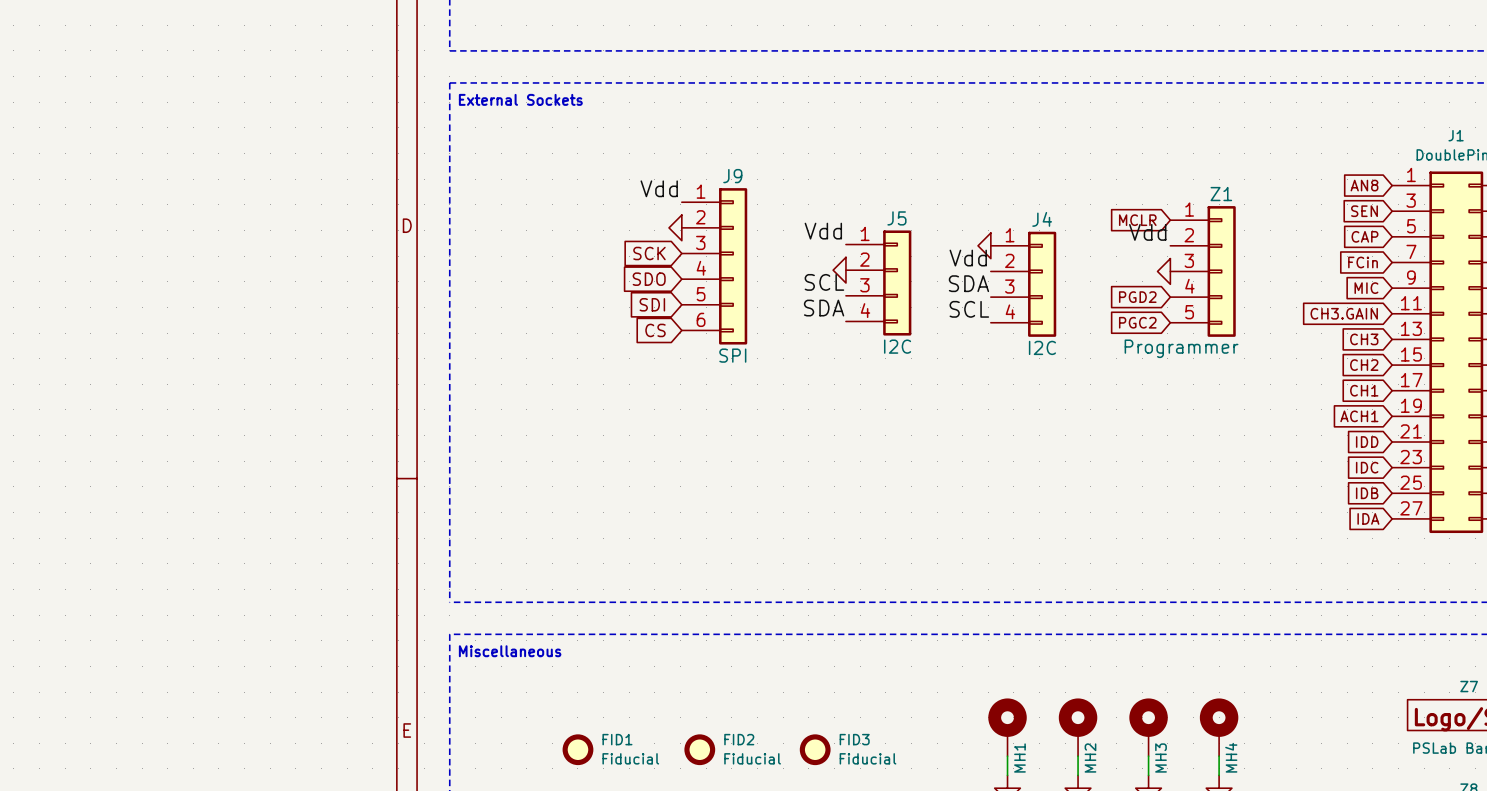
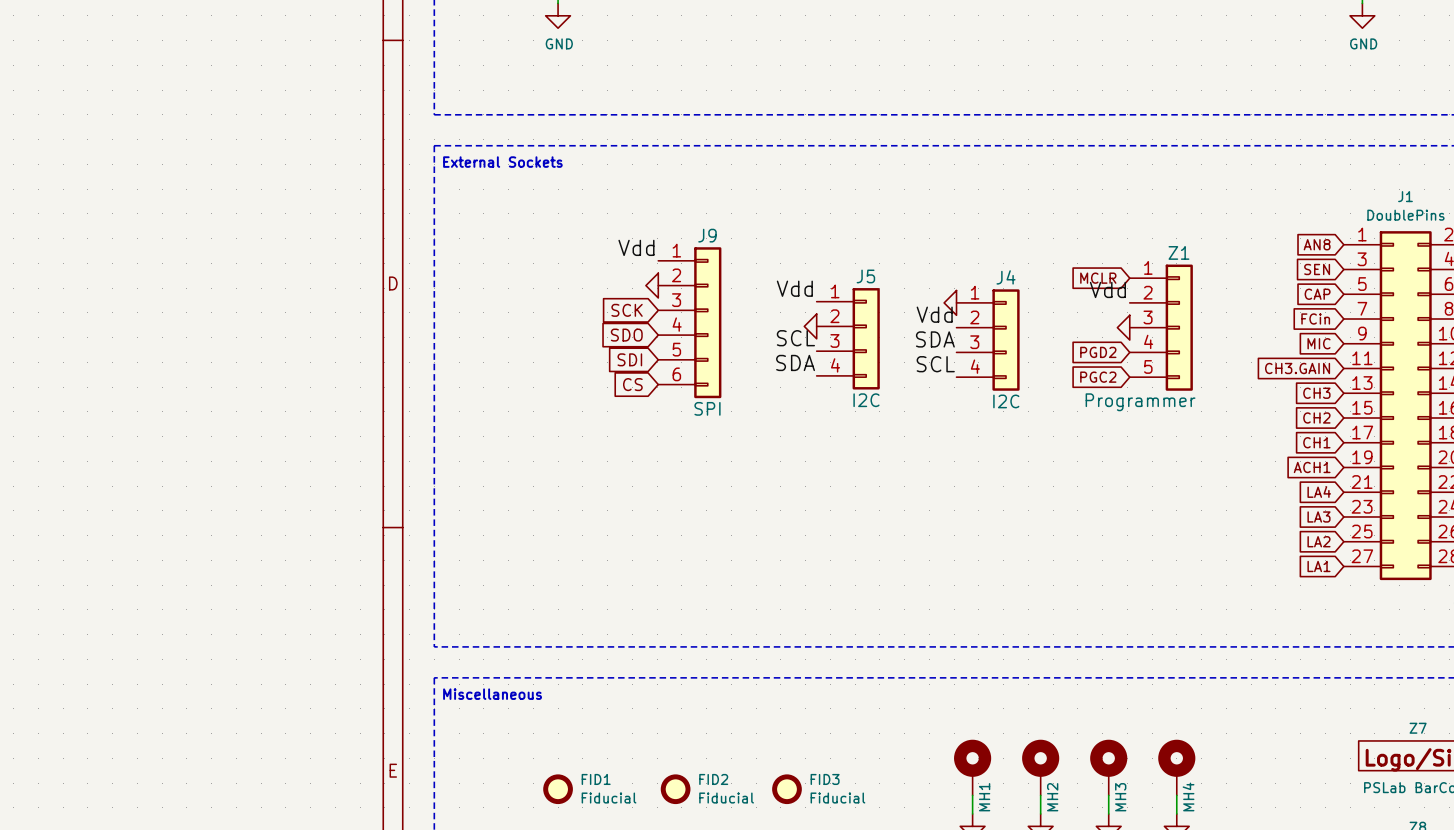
global label: IDD (1367, 442) -> LA4 (1319, 492)
global label: IDC (1367, 467) -> LA3 (1319, 516)
global label: IDB (1367, 493) -> LA2 (1319, 541)
global label: IDA (1368, 518) -> LA1 (1319, 566)

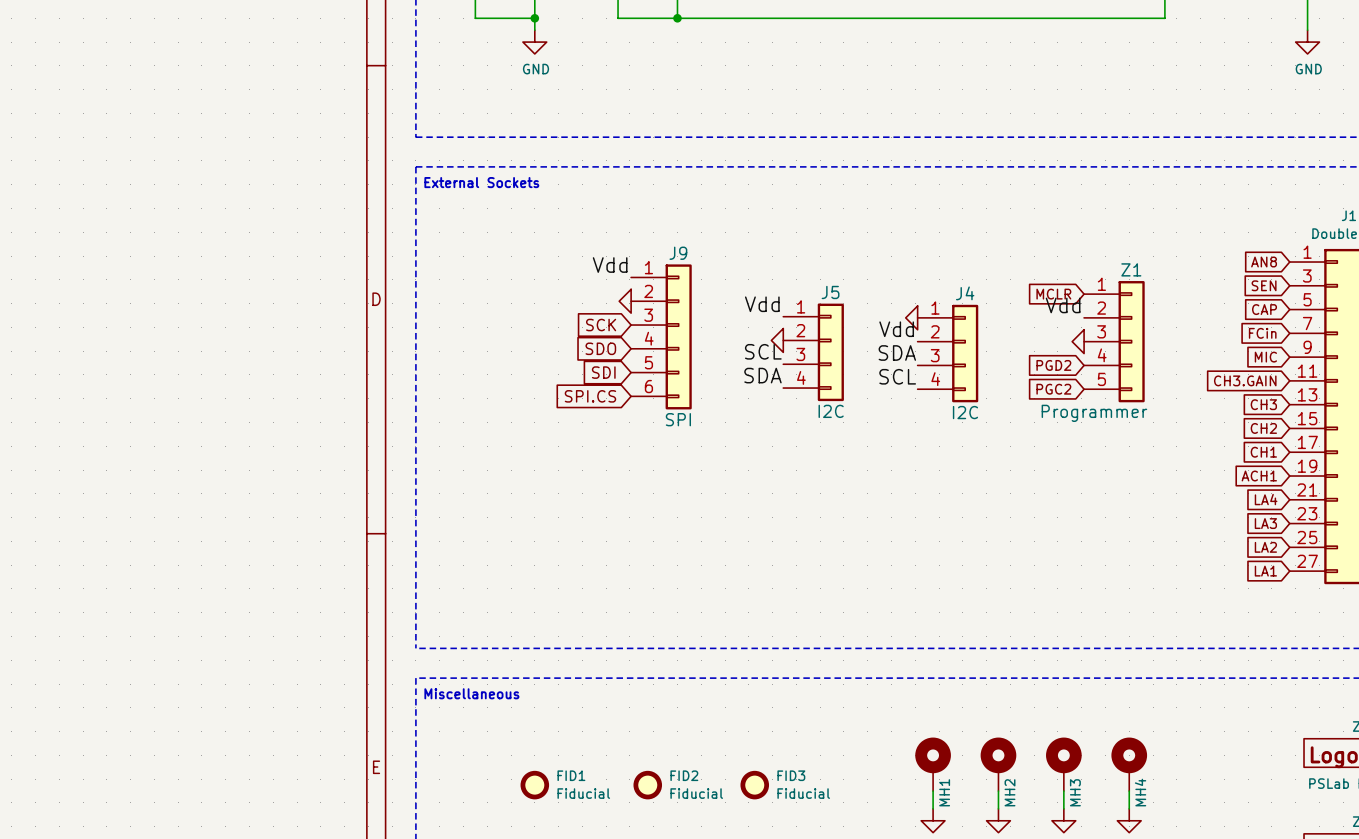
global label: CS (632, 384) -> SPI.CS (590, 396)

